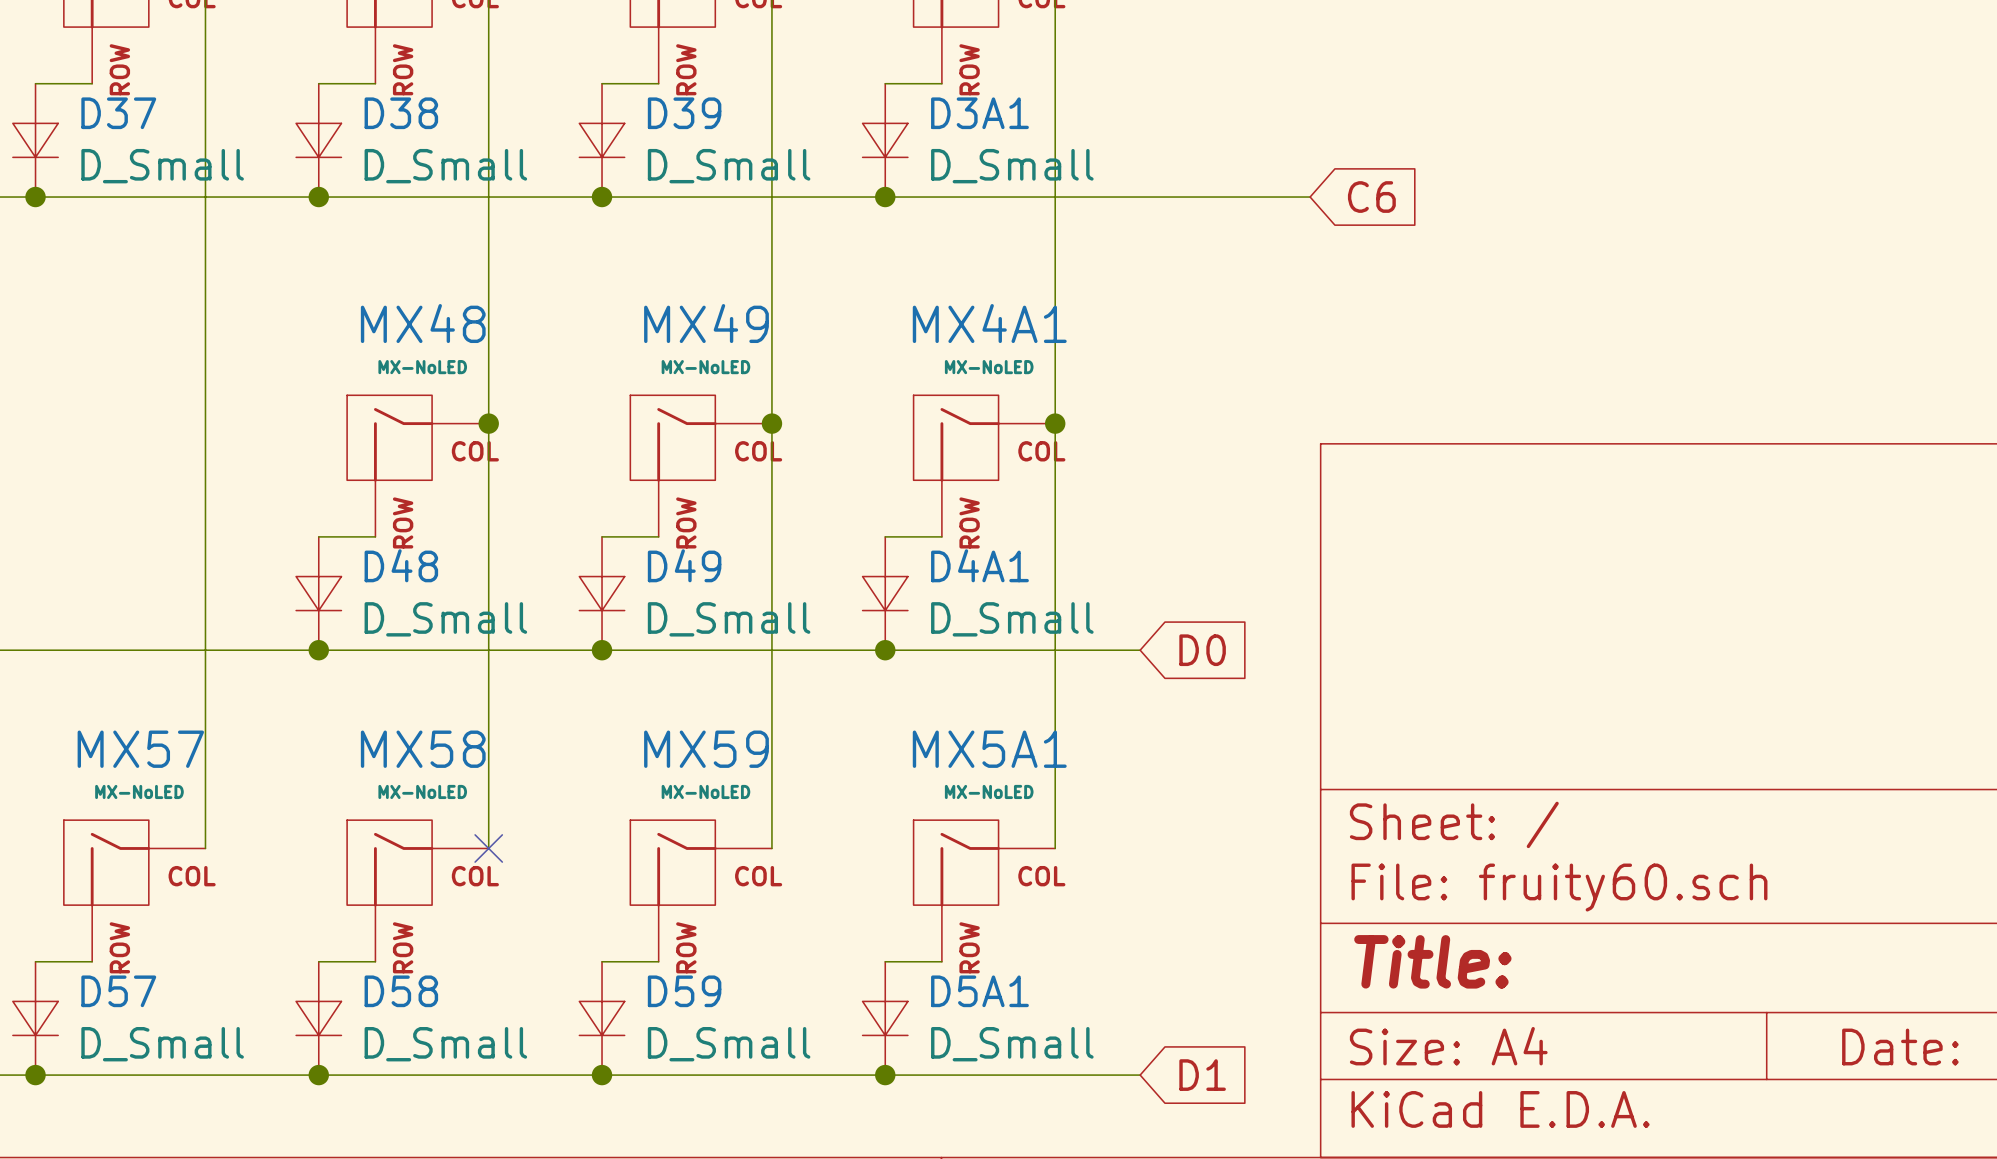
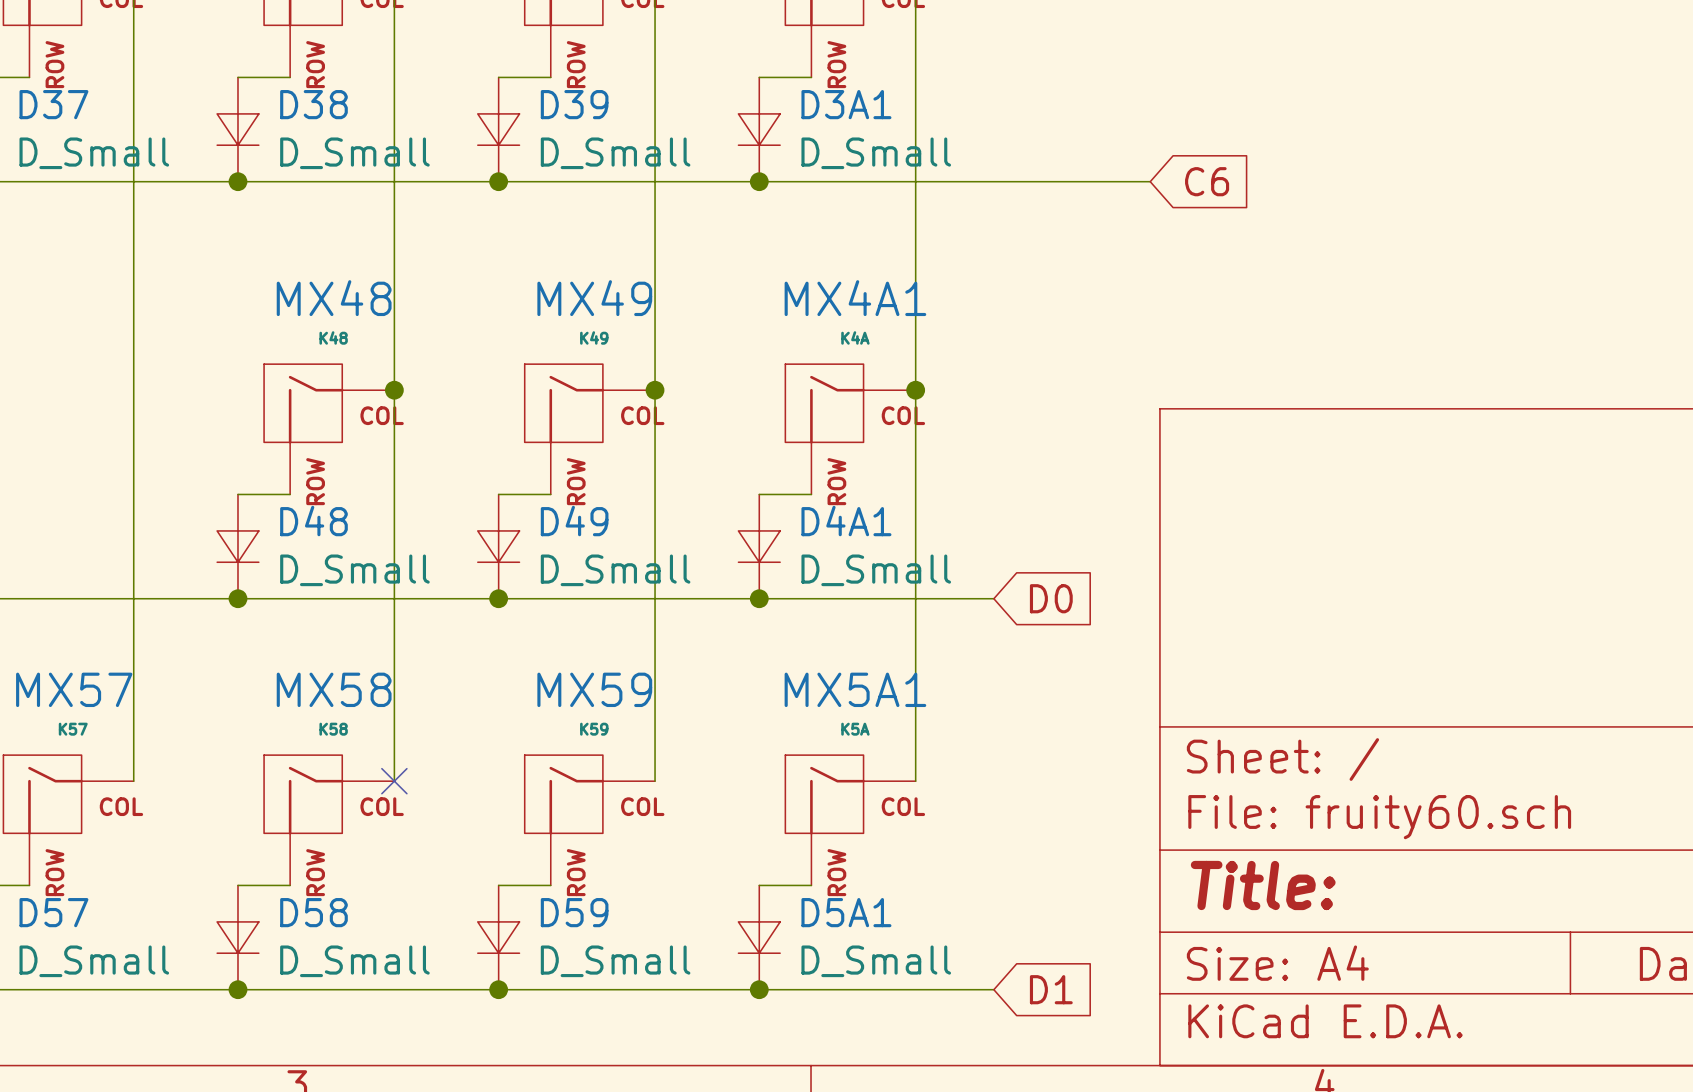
MX48 value: MX-NoLED (422, 367) -> K48 (333, 337)
MX49 value: MX-NoLED (705, 367) -> K49 (594, 337)
MX4A1 value: MX-NoLED (989, 367) -> K4A (855, 337)
MX57 value: MX-NoLED (139, 791) -> K57 (73, 729)
MX58 value: MX-NoLED (422, 791) -> K58 (333, 729)
MX59 value: MX-NoLED (705, 791) -> K59 (594, 729)
MX5A1 value: MX-NoLED (989, 791) -> K5A (855, 729)

